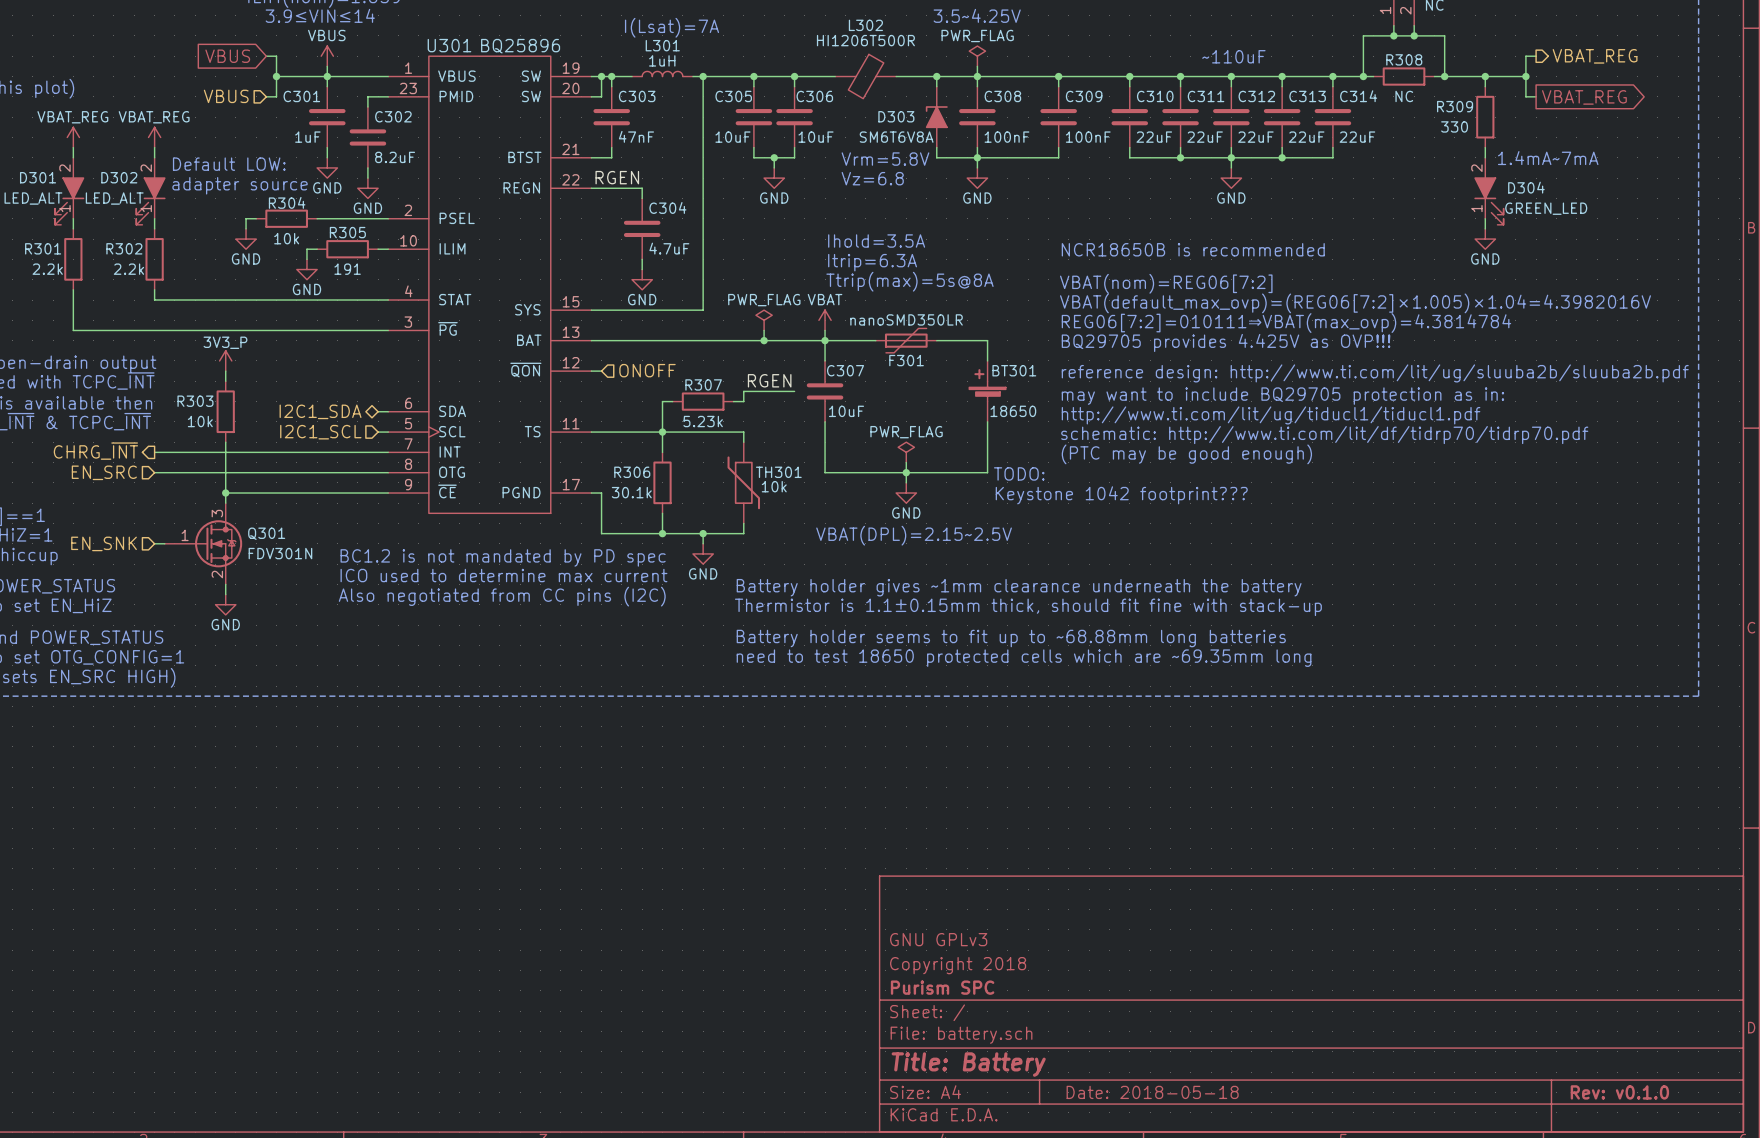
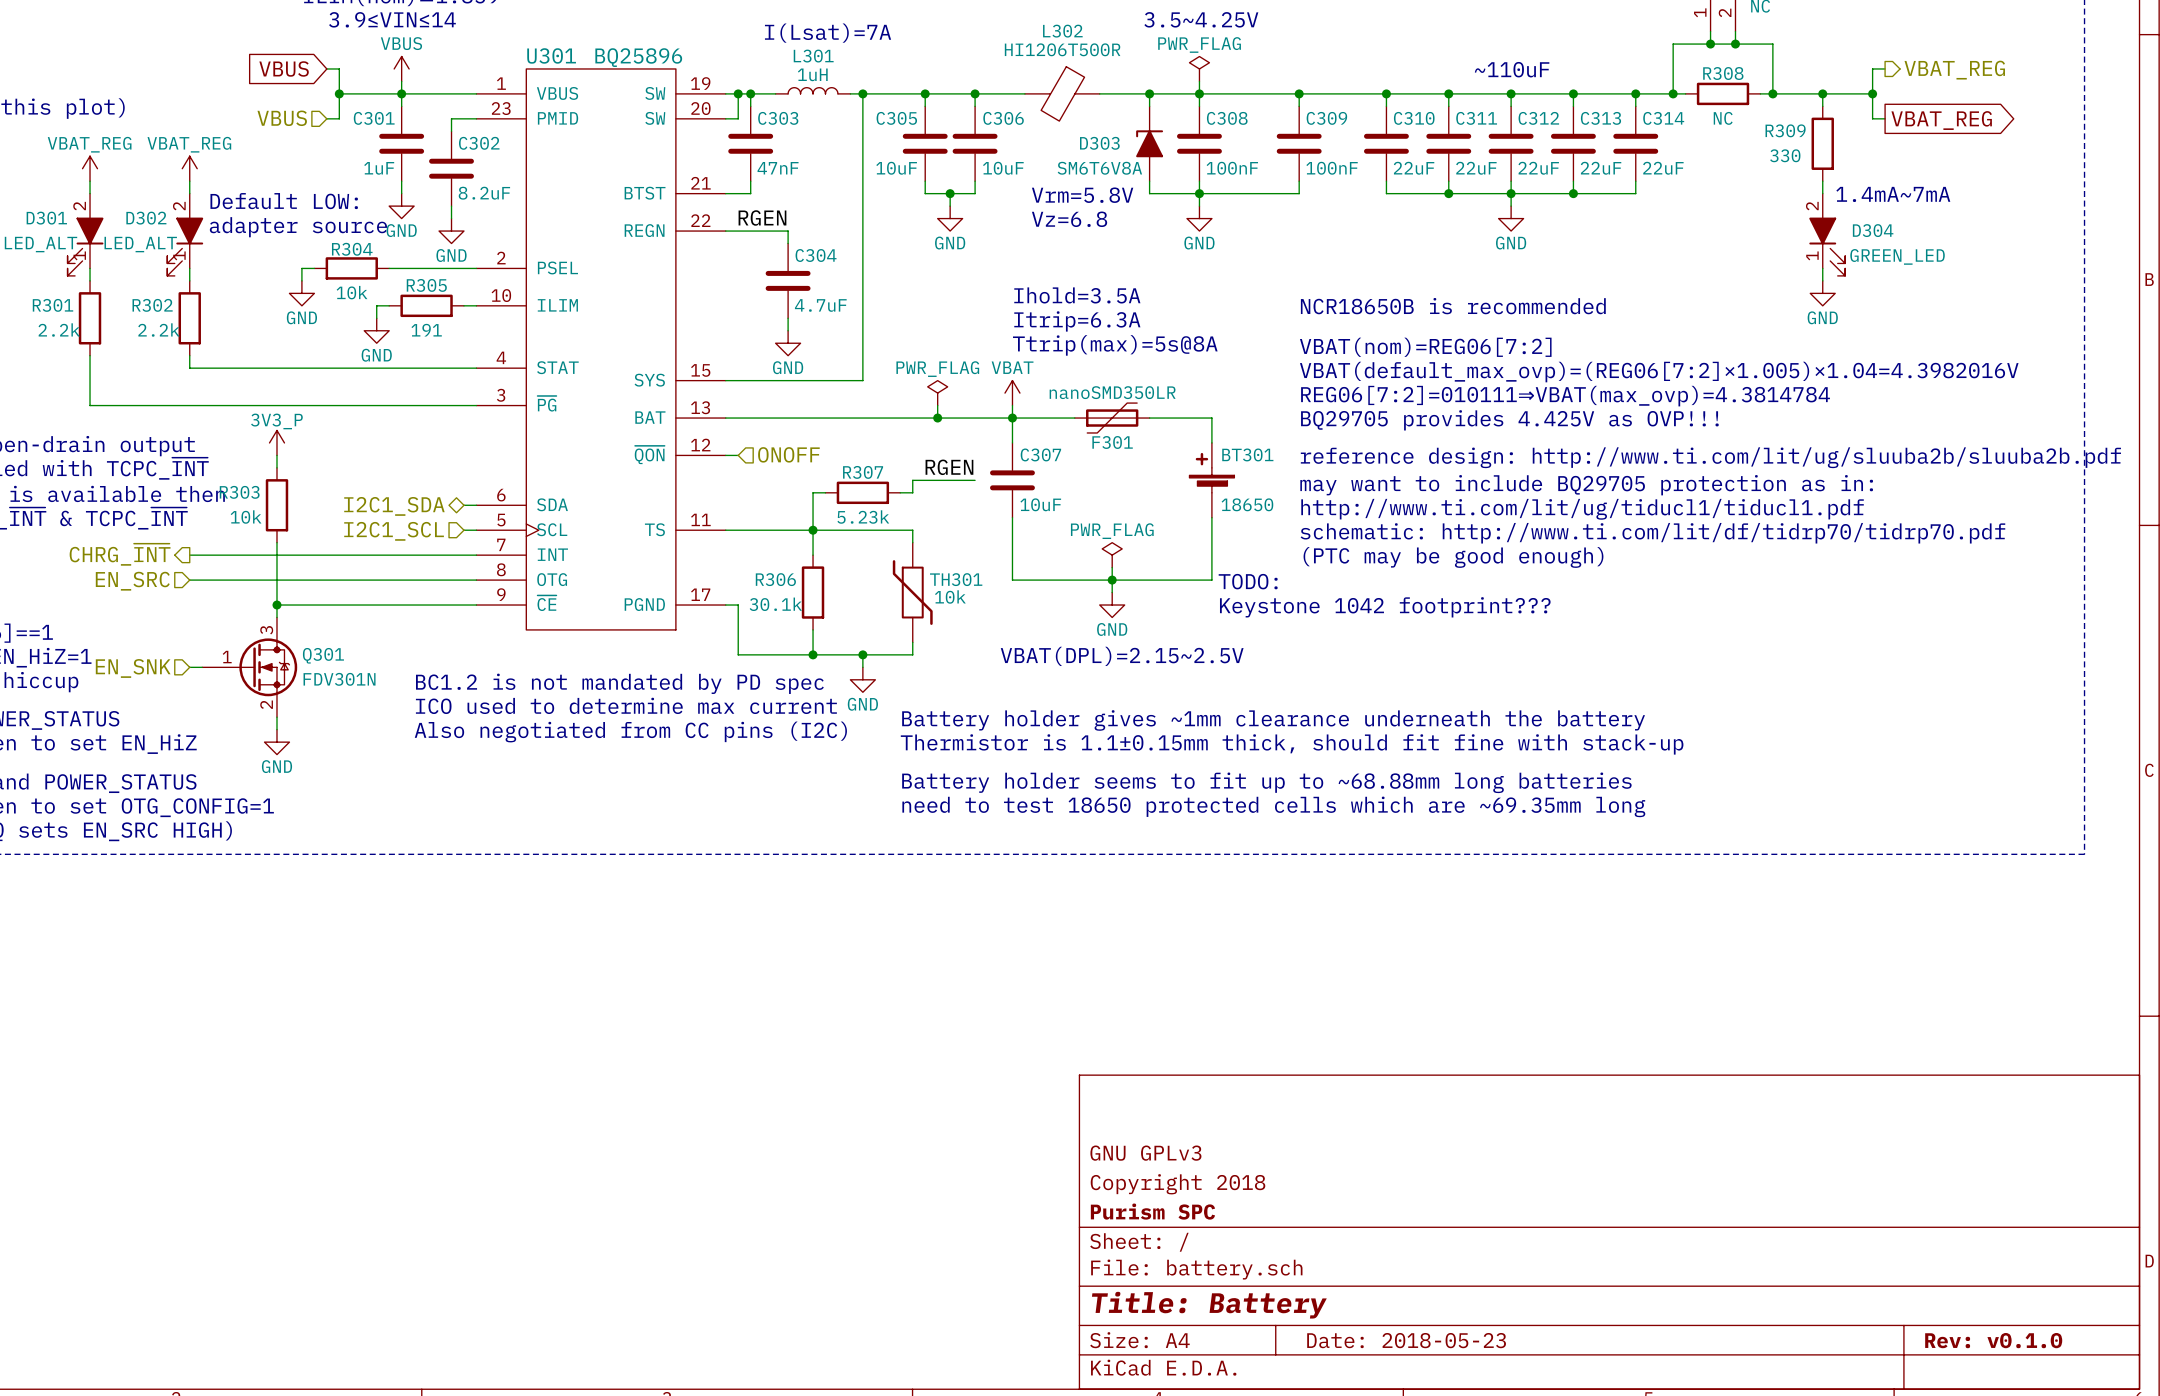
title block: Date: 2018-05-18 (1152, 1092) -> Date: 2018-05-23 (1406, 1340)

